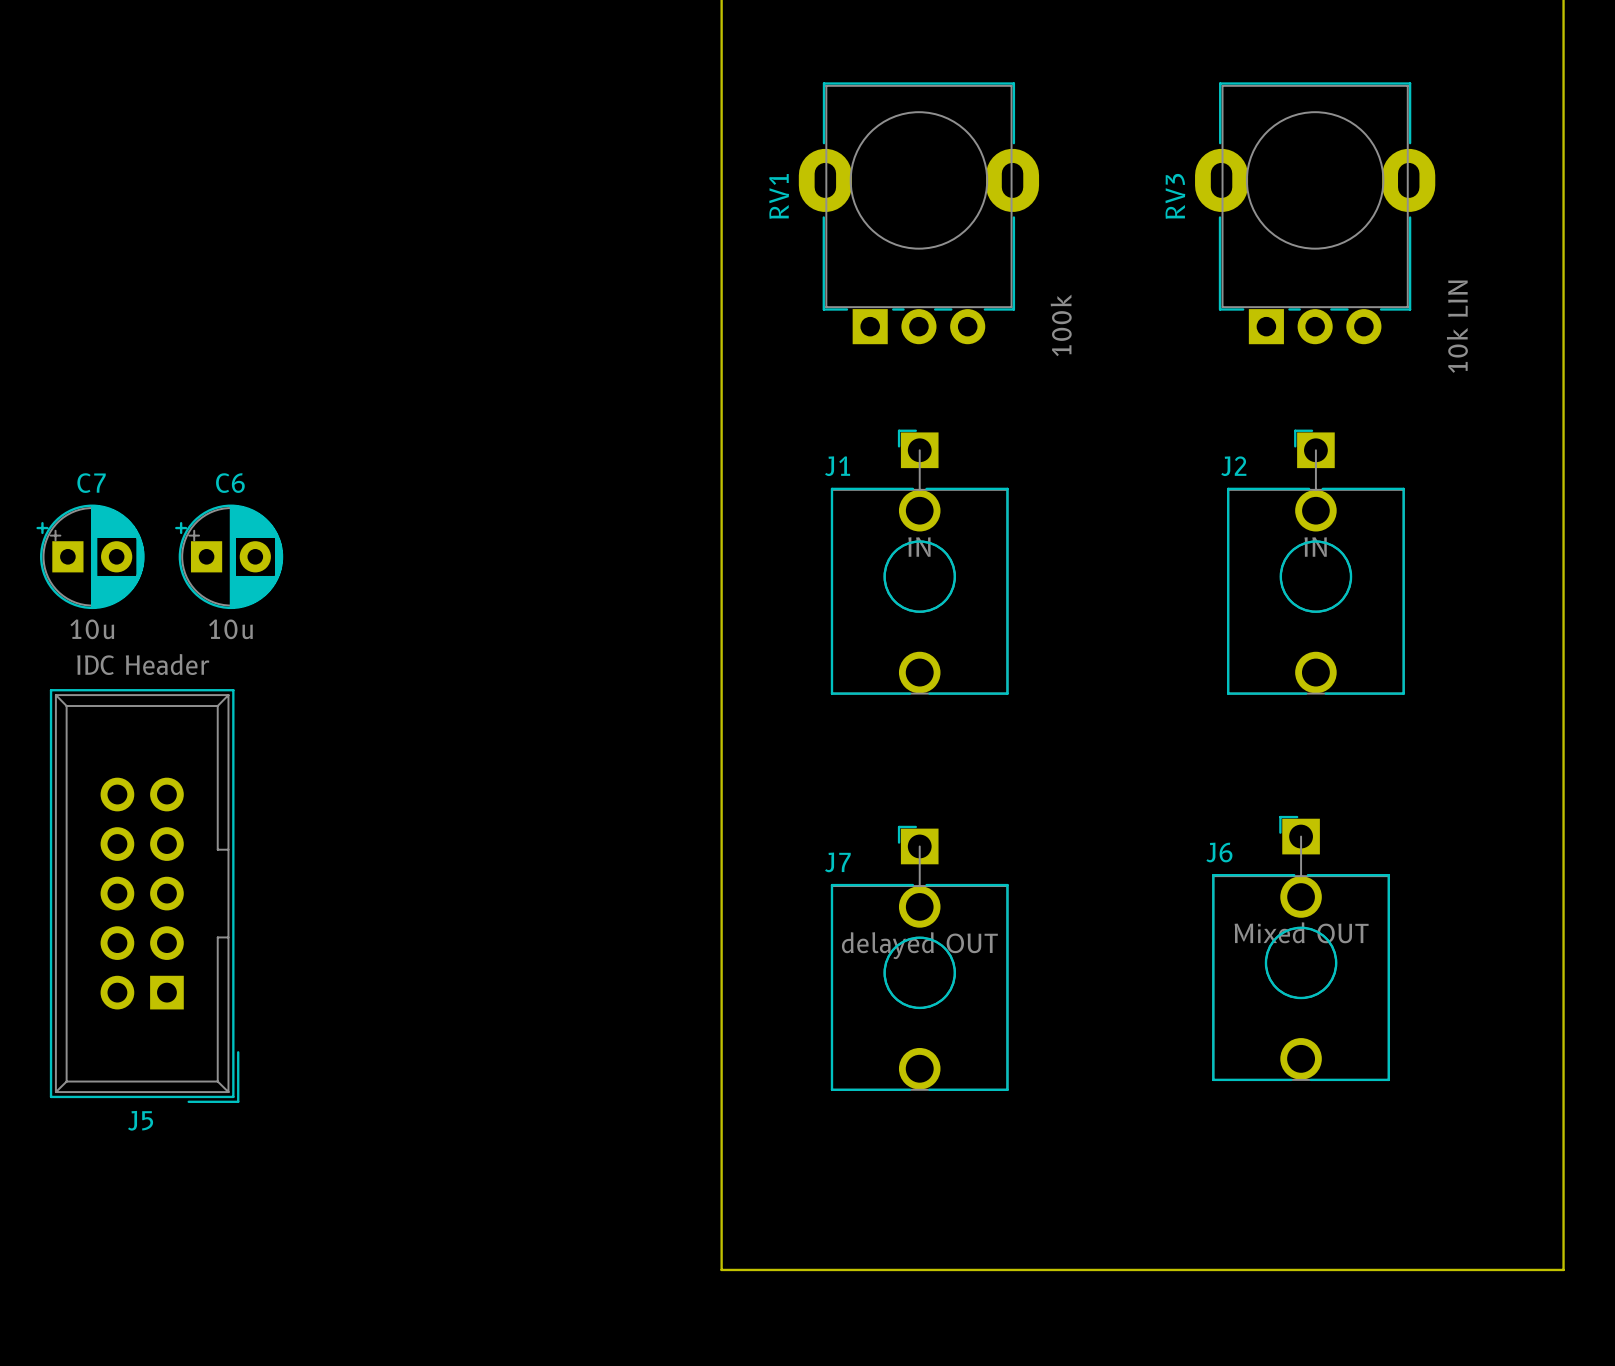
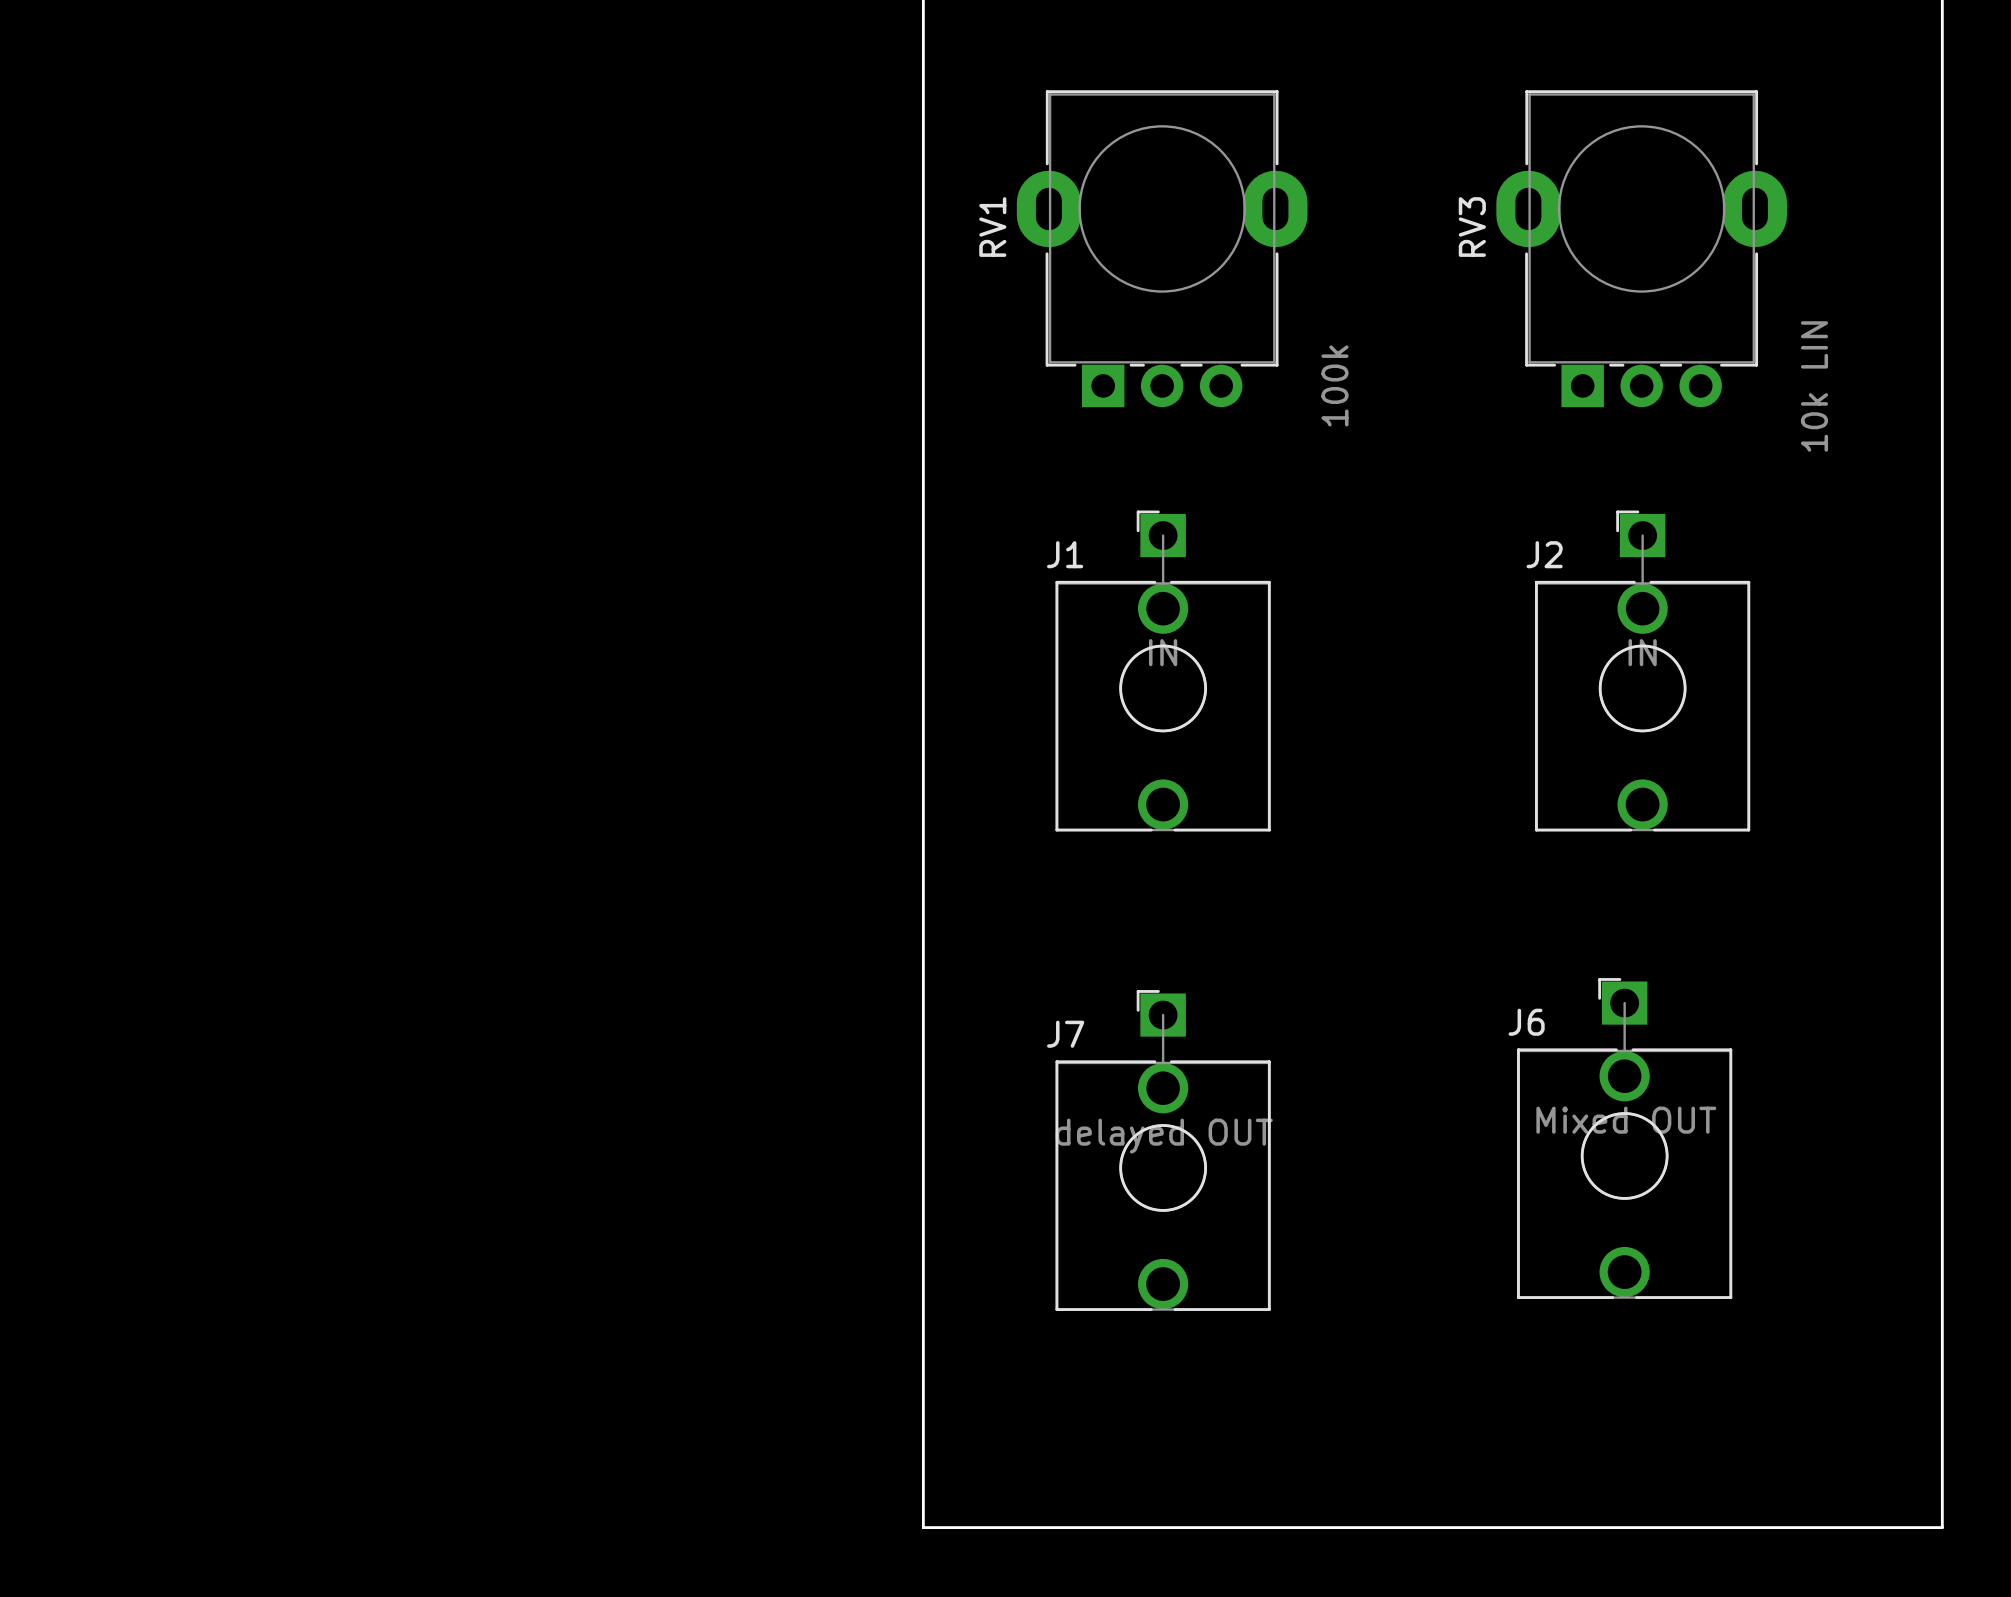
C7: 10u (90, 556) -> none
C6: 10u (229, 556) -> none
J5: IDC Header (144, 896) -> none

